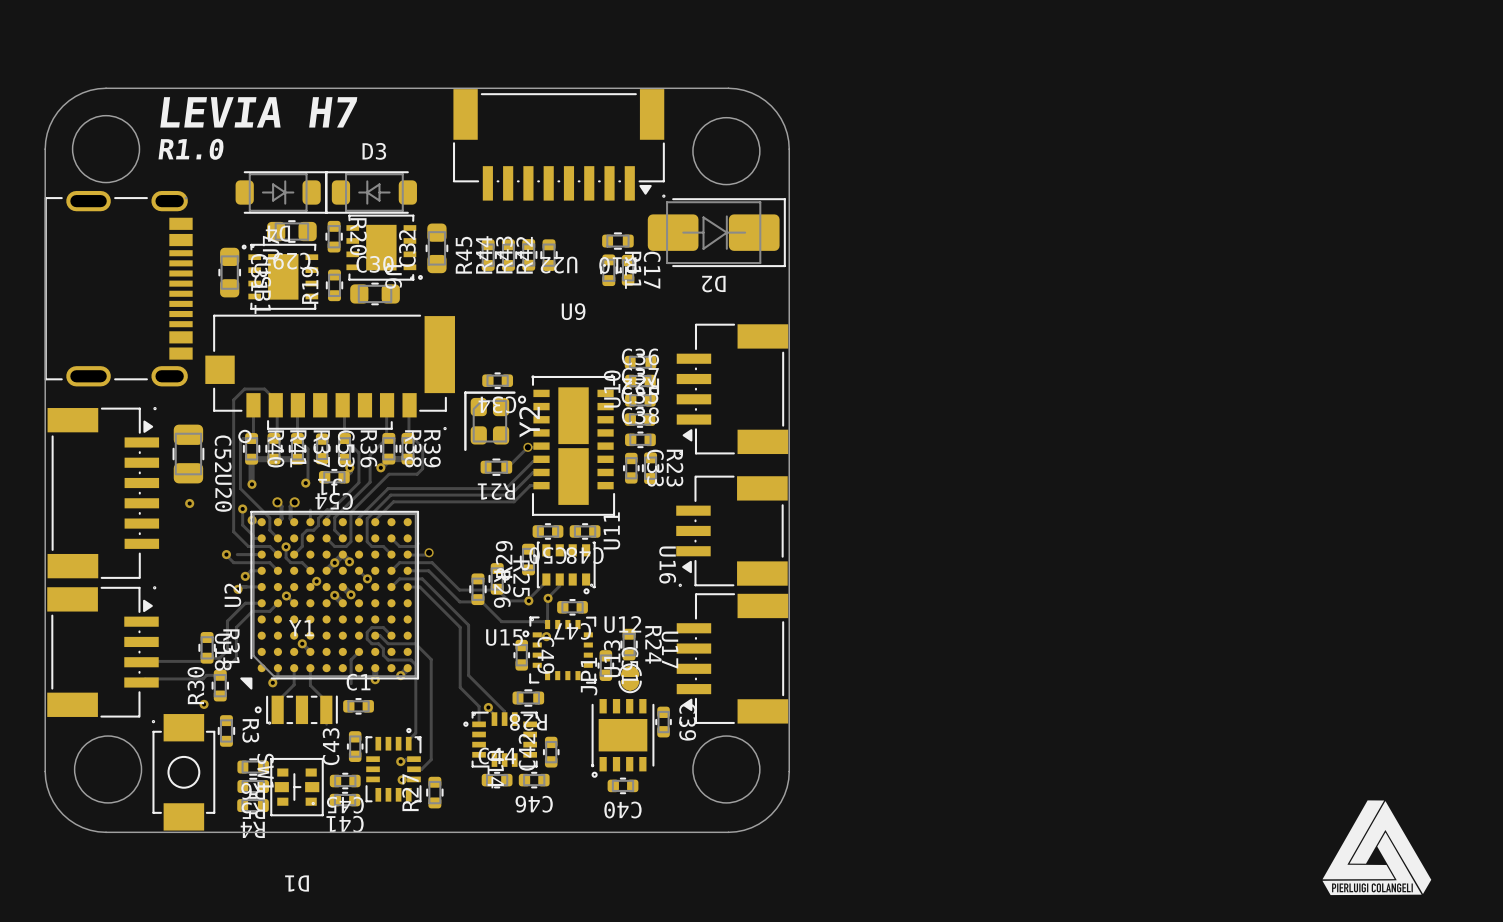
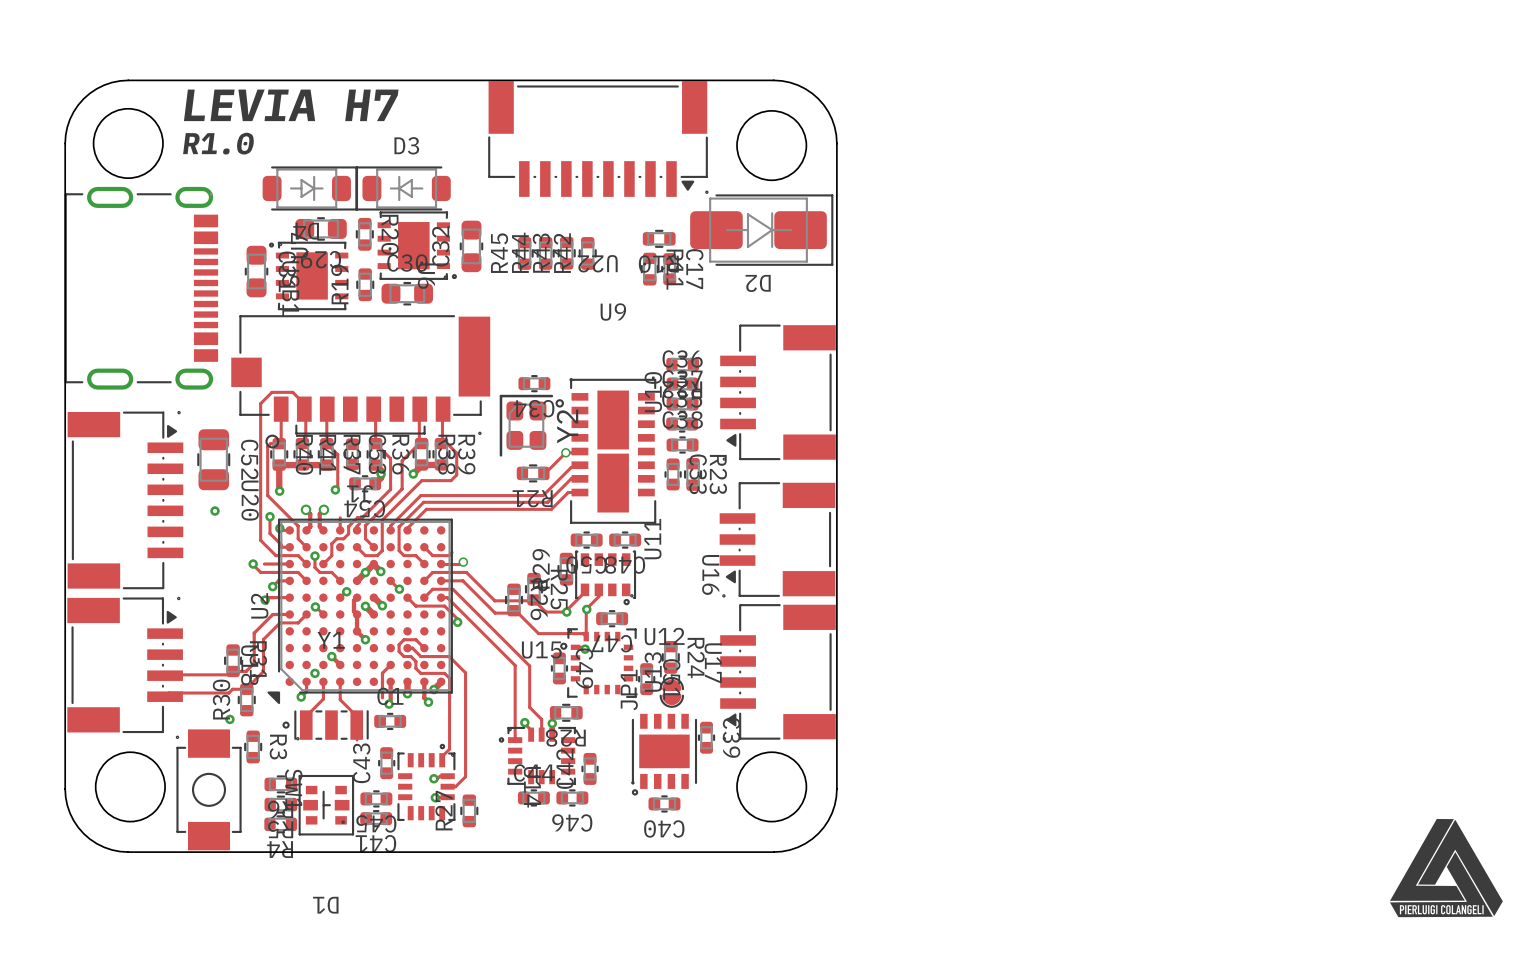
track: (419, 578) (422, 578) (468, 625) (468, 675) (504, 711) -> (452, 589) (529, 666) (529, 707) (541, 719) (541, 726)
track: none -> (357, 597) (353, 600) (353, 611) (357, 614) (357, 631) (365, 639)
track: none -> (407, 597) (415, 606) (444, 606) (457, 619) (457, 622)
track: (413, 587) (419, 587) (460, 627) (460, 687) (479, 706) -> (447, 597) (515, 665) (515, 721)
via: none -> (457, 622)
via: none -> (365, 639)
via: none -> (314, 673)
track: none -> (390, 681) (390, 702) (389, 704)
track: none -> (424, 681) (424, 698) (428, 702)
via: none -> (428, 702)
via: none -> (389, 704)
via: none -> (552, 723)

